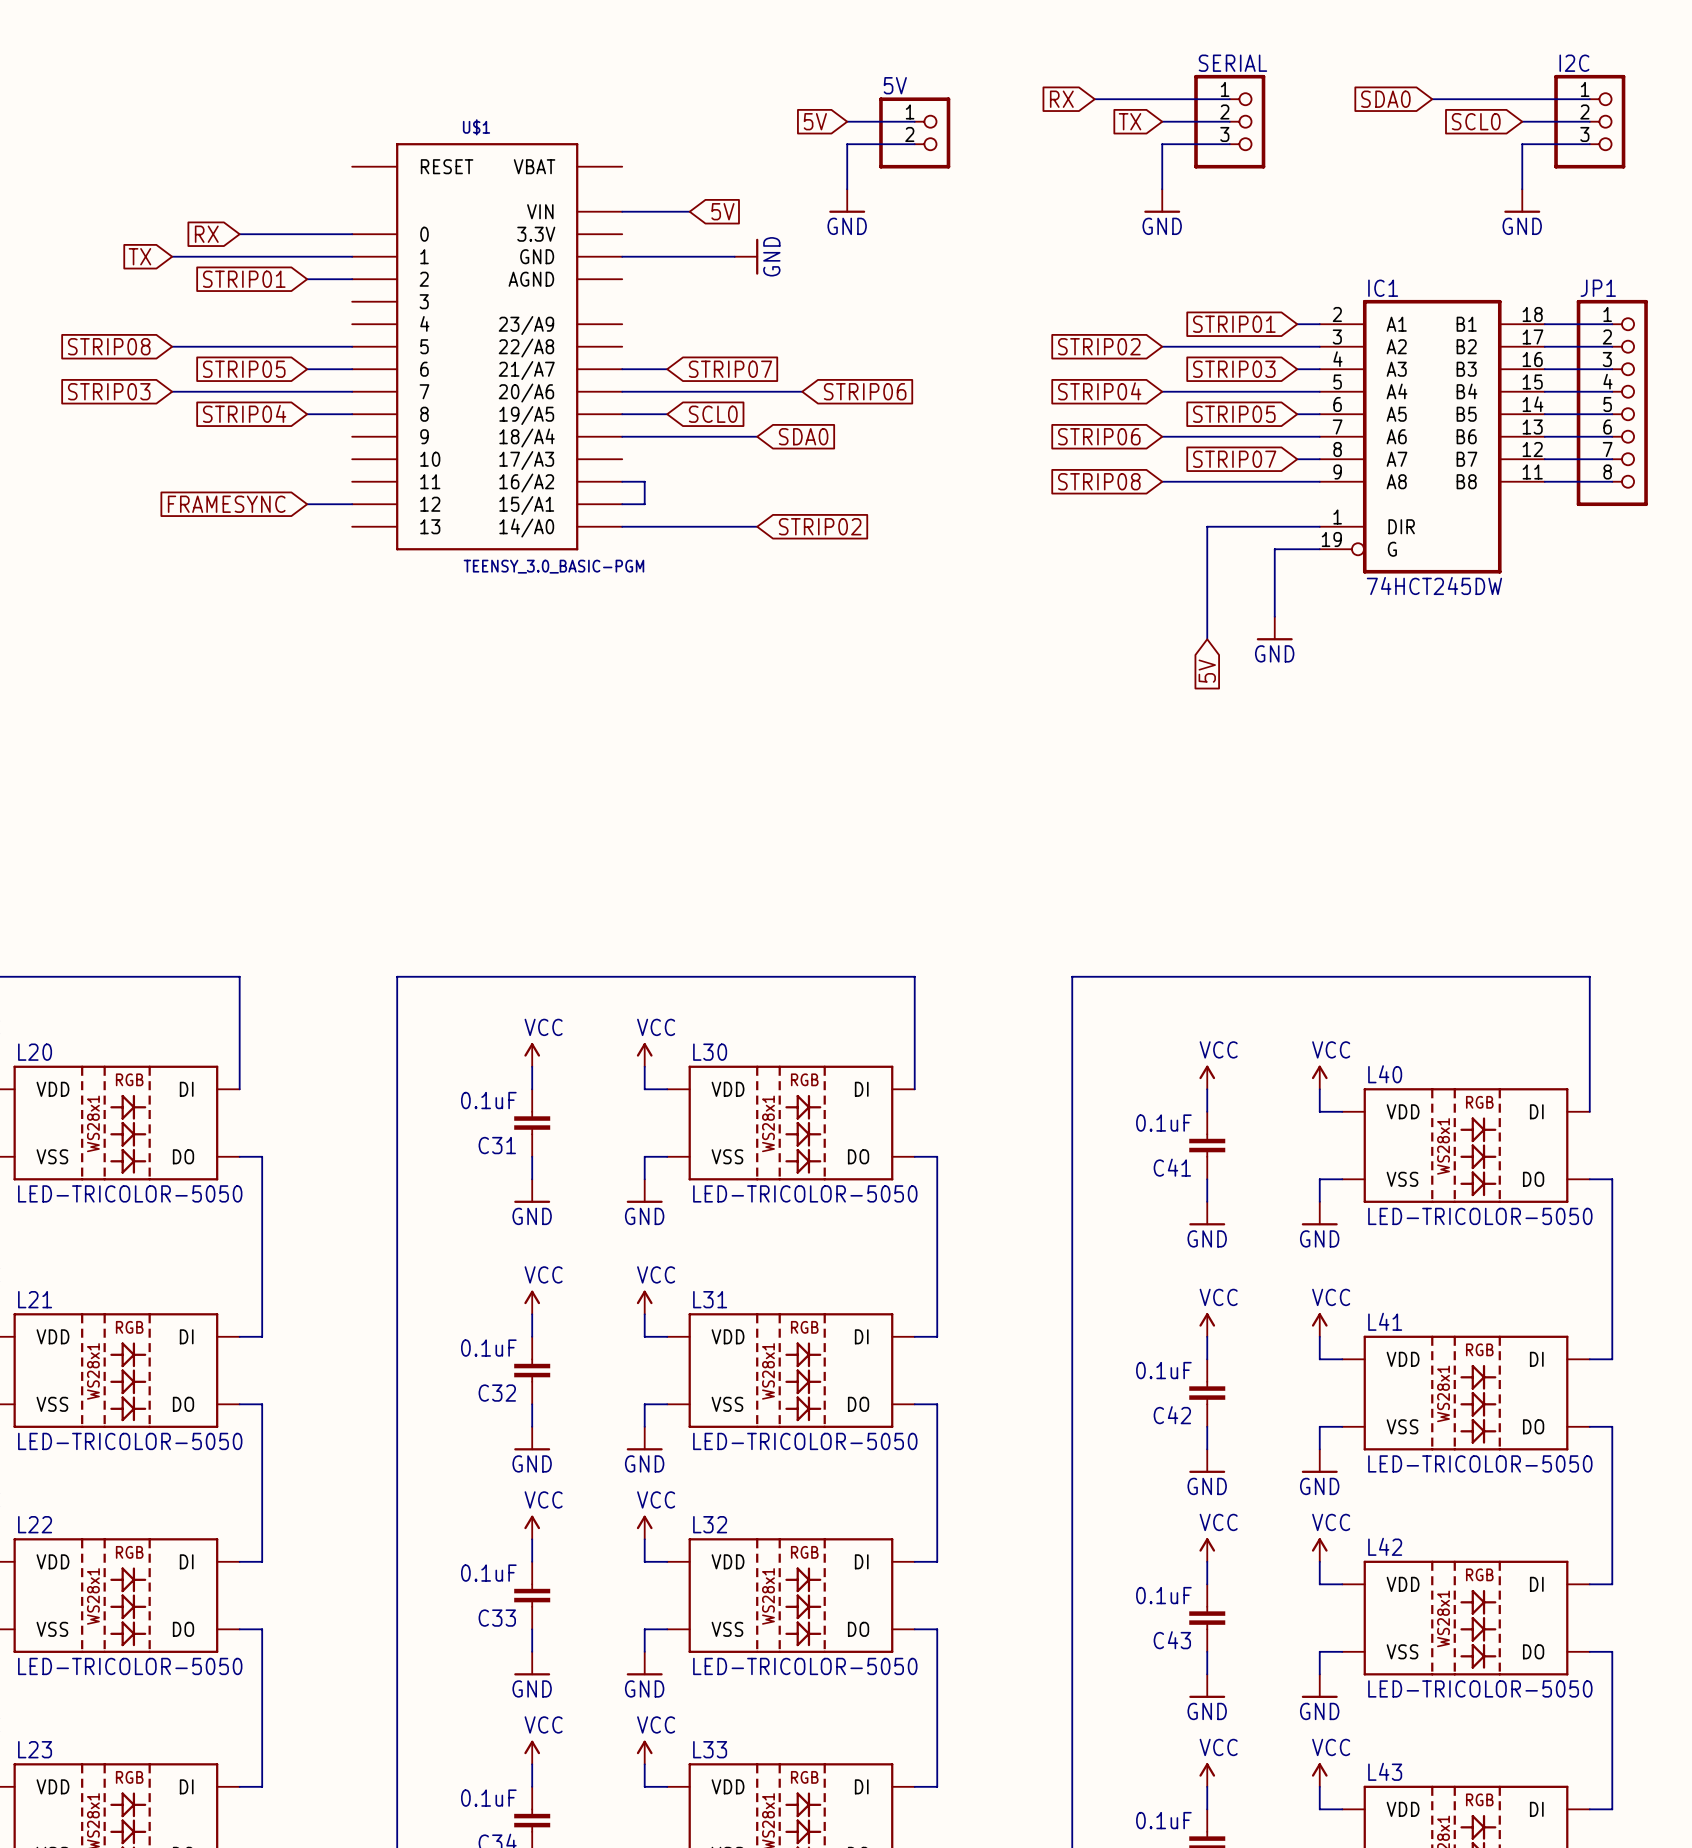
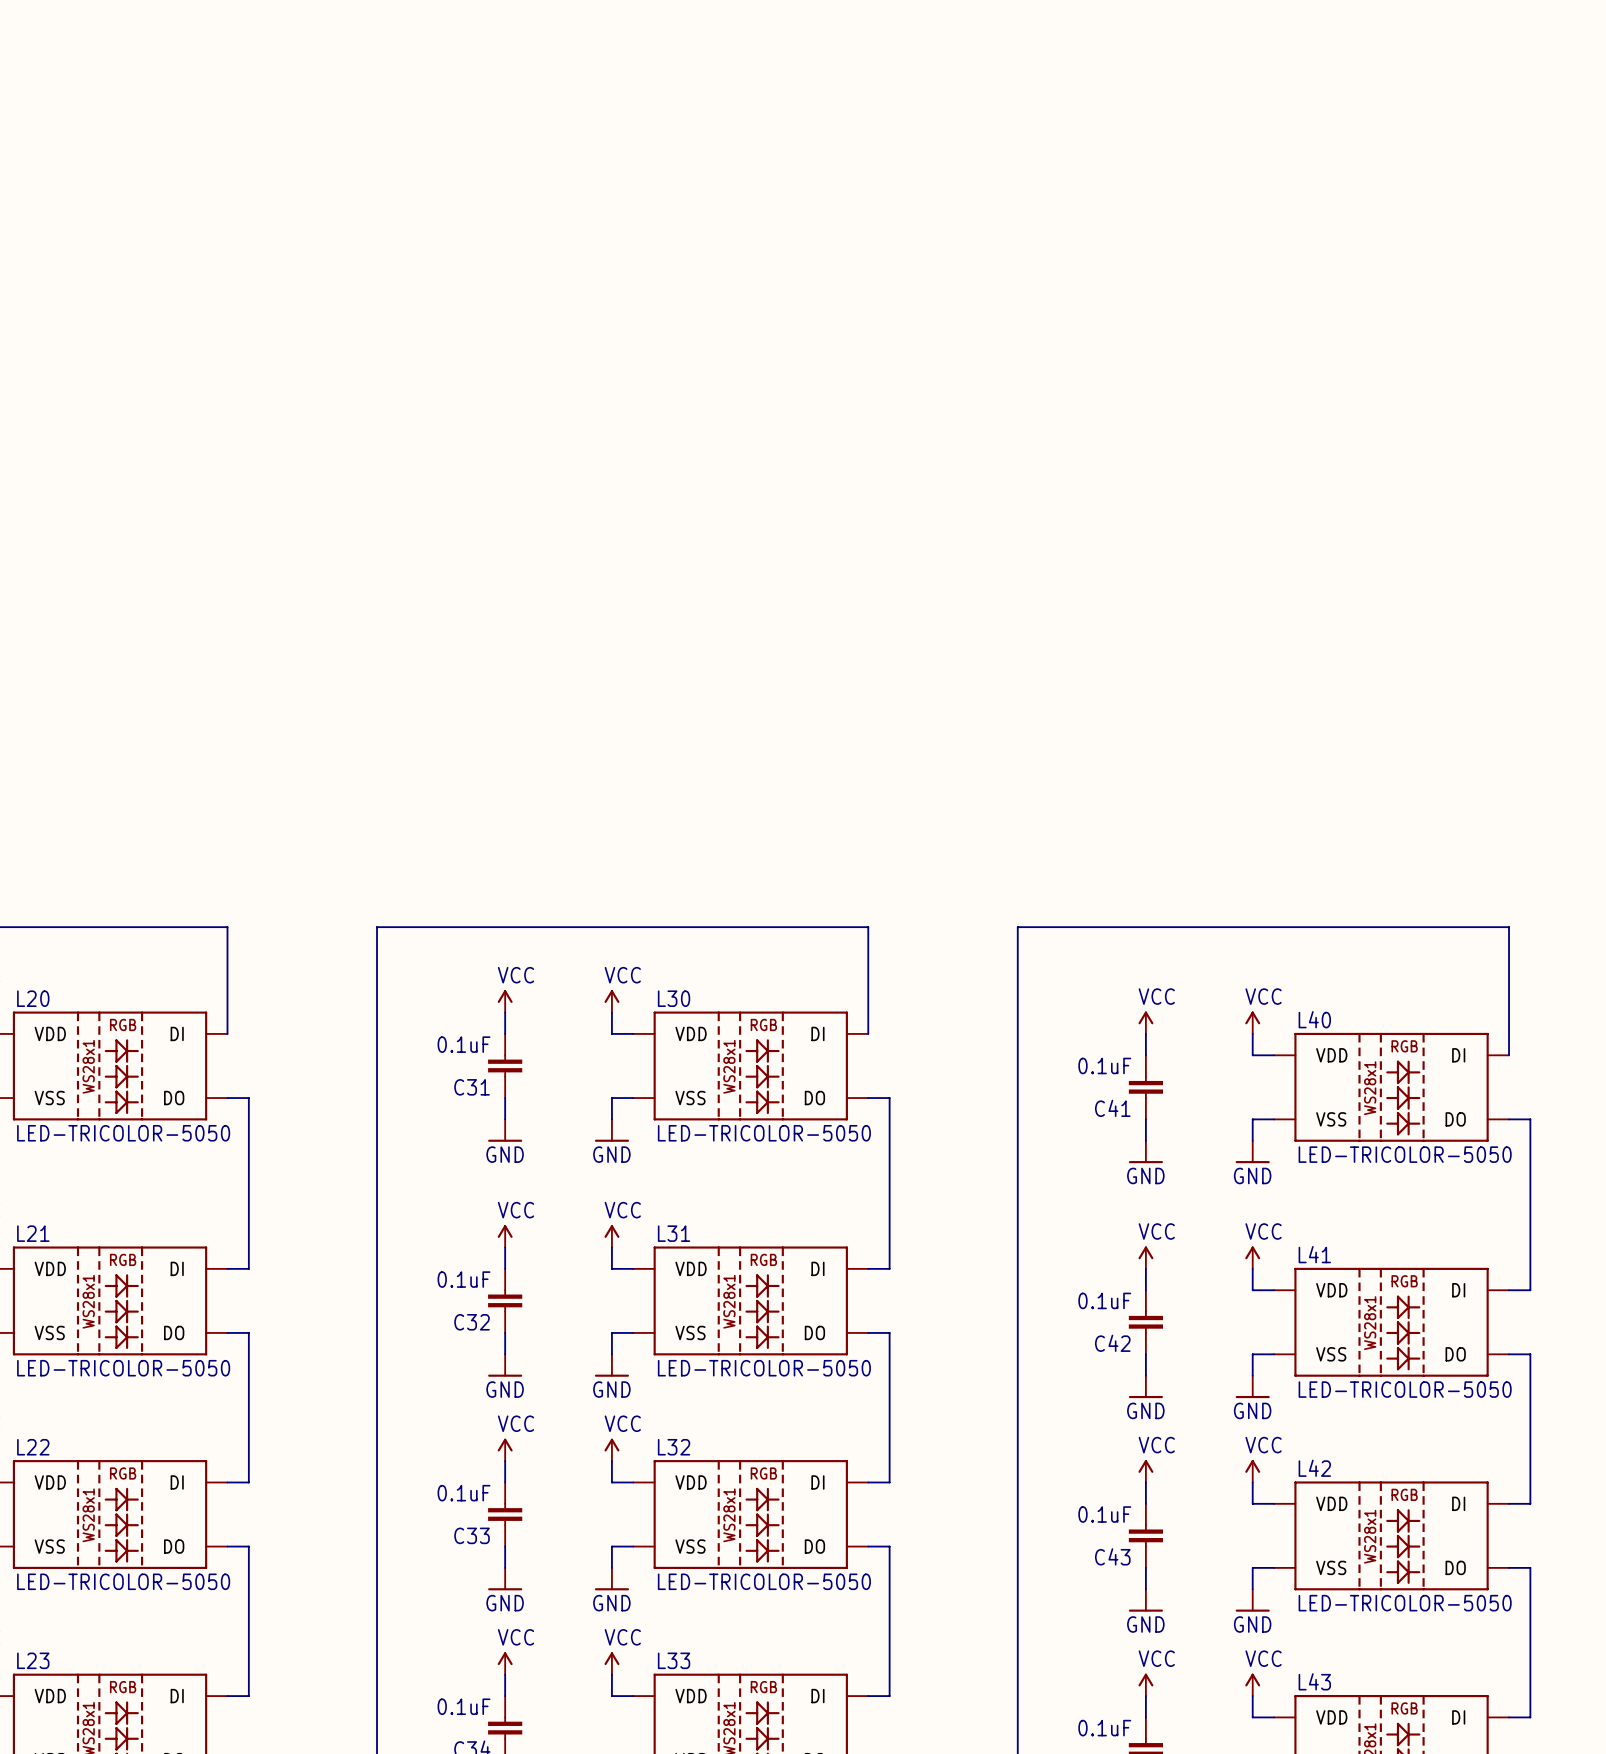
global label: RX (1061, 99) -> none
wire: (1094, 99) (1229, 99) -> none
global label: SDA0 (1385, 99) -> none
wire: (1432, 99) (1589, 99) -> none
global label: 5V (815, 121) -> none
wire: (847, 121) (914, 121) -> none
global label: TX (1130, 121) -> none
wire: (1162, 121) (1229, 121) -> none
SERIAL: (1229, 121) -> none
global label: SCL0 (1476, 121) -> none
wire: (1522, 121) (1589, 121) -> none
I2C: (1589, 121) -> none
5V: (914, 132) -> none
wire: (914, 144) (847, 144) (847, 189) -> none
wire: (1229, 144) (1162, 144) (1162, 189) -> none
wire: (1589, 144) (1522, 144) (1522, 189) -> none
power symbol: GND (847, 201) -> none
power symbol: GND (1162, 201) -> none
power symbol: GND (1522, 201) -> none
wire: (622, 211) (689, 211) -> none
global label: 5V (722, 211) -> none
global label: RX (206, 234) -> none
wire: (239, 234) (352, 234) -> none
global label: TX (139, 256) -> none
wire: (172, 256) (352, 256) -> none
wire: (622, 256) (734, 256) -> none
power symbol: GND (746, 256) -> none
global label: STRIP01 (244, 279) -> none
wire: (307, 279) (352, 279) -> none
global label: STRIP01 (1234, 324) -> none
wire: (1297, 324) (1319, 324) -> none
wire: (1544, 324) (1612, 324) -> none
global label: STRIP08 (109, 346) -> none
wire: (172, 346) (352, 346) -> none
U$1: TEENSY_3.0_BASIC-PGM (487, 346) -> none
global label: STRIP02 (1099, 346) -> none
wire: (1162, 346) (1319, 346) -> none
wire: (1544, 346) (1612, 346) -> none
global label: STRIP05 (244, 369) -> none
wire: (307, 369) (352, 369) -> none
wire: (622, 369) (667, 369) -> none
global label: STRIP07 (730, 369) -> none
global label: STRIP03 (1234, 369) -> none
wire: (1297, 369) (1319, 369) -> none
wire: (1544, 369) (1612, 369) -> none
global label: STRIP03 (109, 391) -> none
wire: (172, 391) (352, 391) -> none
wire: (622, 391) (802, 391) -> none
global label: STRIP06 (865, 391) -> none
global label: STRIP04 (1099, 391) -> none
wire: (1162, 391) (1319, 391) -> none
wire: (1544, 391) (1612, 391) -> none
JP1: (1612, 402) -> none
global label: STRIP04 (244, 413) -> none
wire: (307, 414) (352, 414) -> none
wire: (622, 414) (667, 414) -> none
global label: SCL0 (713, 414) -> none
global label: STRIP05 (1234, 414) -> none
wire: (1297, 414) (1319, 414) -> none
wire: (1544, 414) (1612, 414) -> none
wire: (622, 436) (757, 436) -> none
global label: SDA0 (803, 436) -> none
global label: STRIP06 (1099, 436) -> none
wire: (1162, 436) (1319, 436) -> none
IC1: 74HCT245DW (1432, 436) -> none
wire: (1544, 436) (1612, 436) -> none
global label: STRIP07 (1234, 459) -> none
wire: (1297, 459) (1319, 459) -> none
wire: (1544, 459) (1612, 459) -> none
wire: (622, 481) (644, 481) (644, 504) (622, 504) -> none
global label: STRIP08 (1099, 481) -> none
wire: (1162, 481) (1319, 481) -> none
wire: (1544, 481) (1612, 481) -> none
global label: FRAMESYNC (226, 504) -> none
wire: (307, 504) (352, 504) -> none
wire: (622, 526) (757, 526) -> none
global label: STRIP02 (820, 526) -> none
wire: (1319, 526) (1207, 526) (1207, 639) -> none
wire: (1319, 549) (1274, 549) (1274, 616) -> none
power symbol: GND (1274, 628) -> none
global label: 5V (1207, 671) -> none

